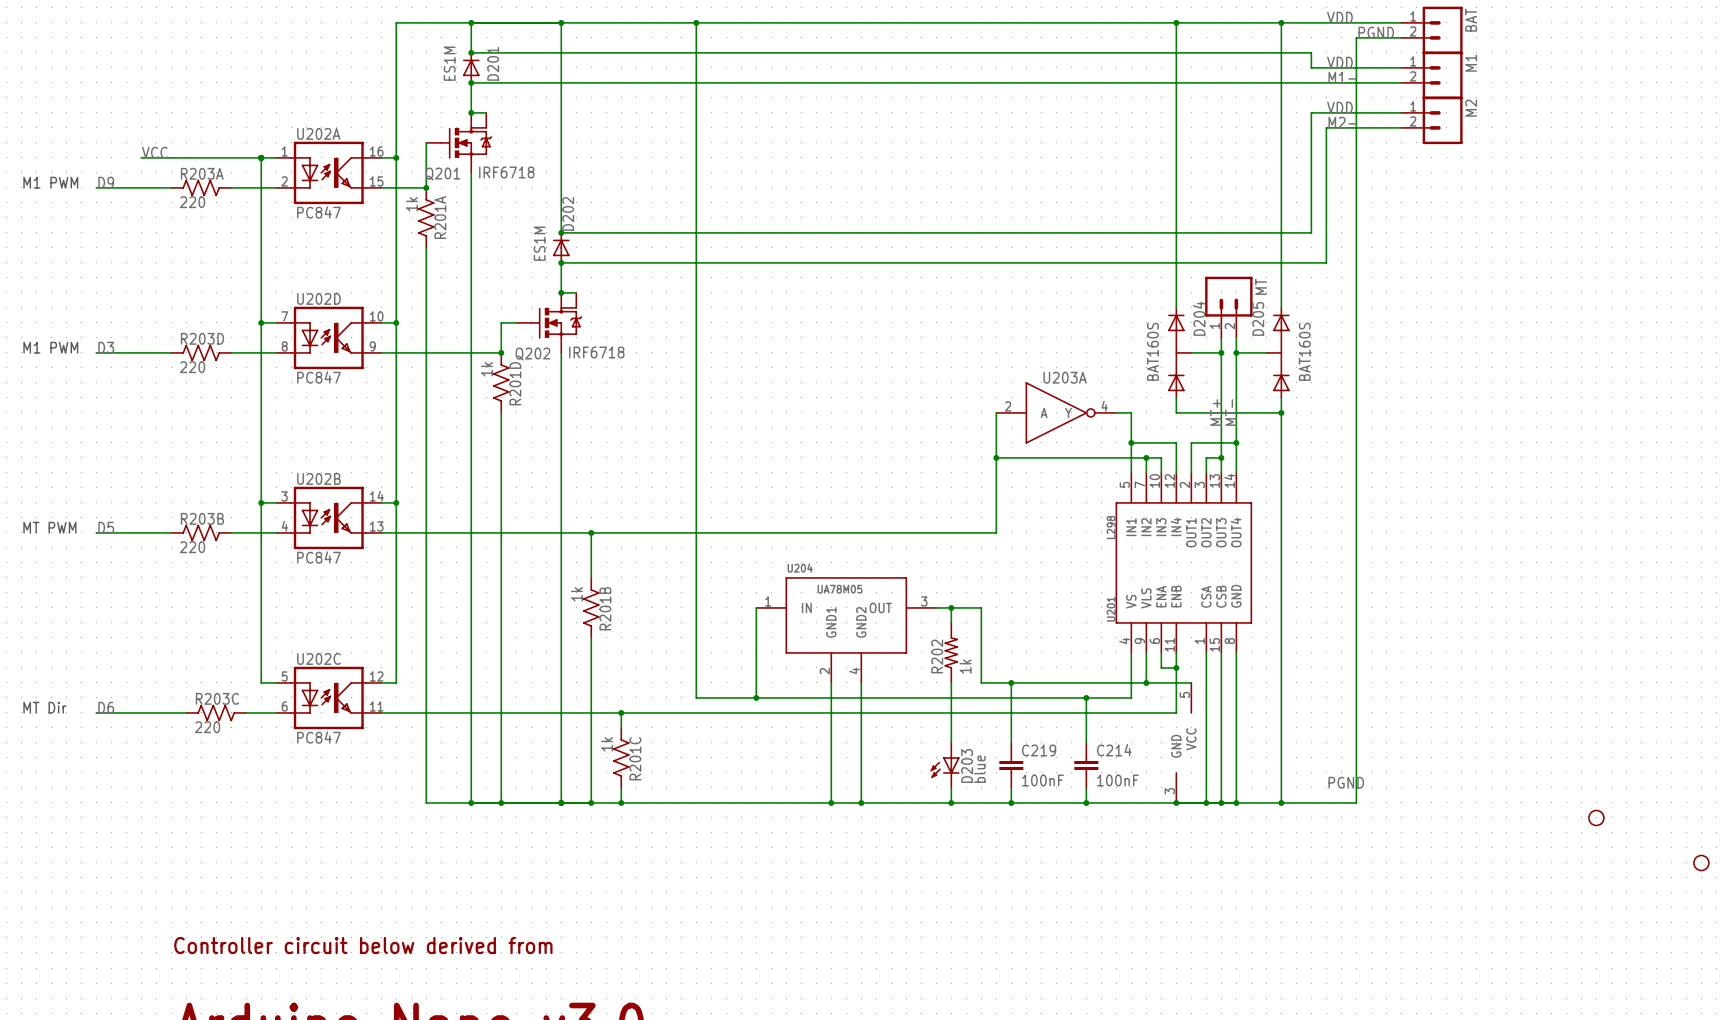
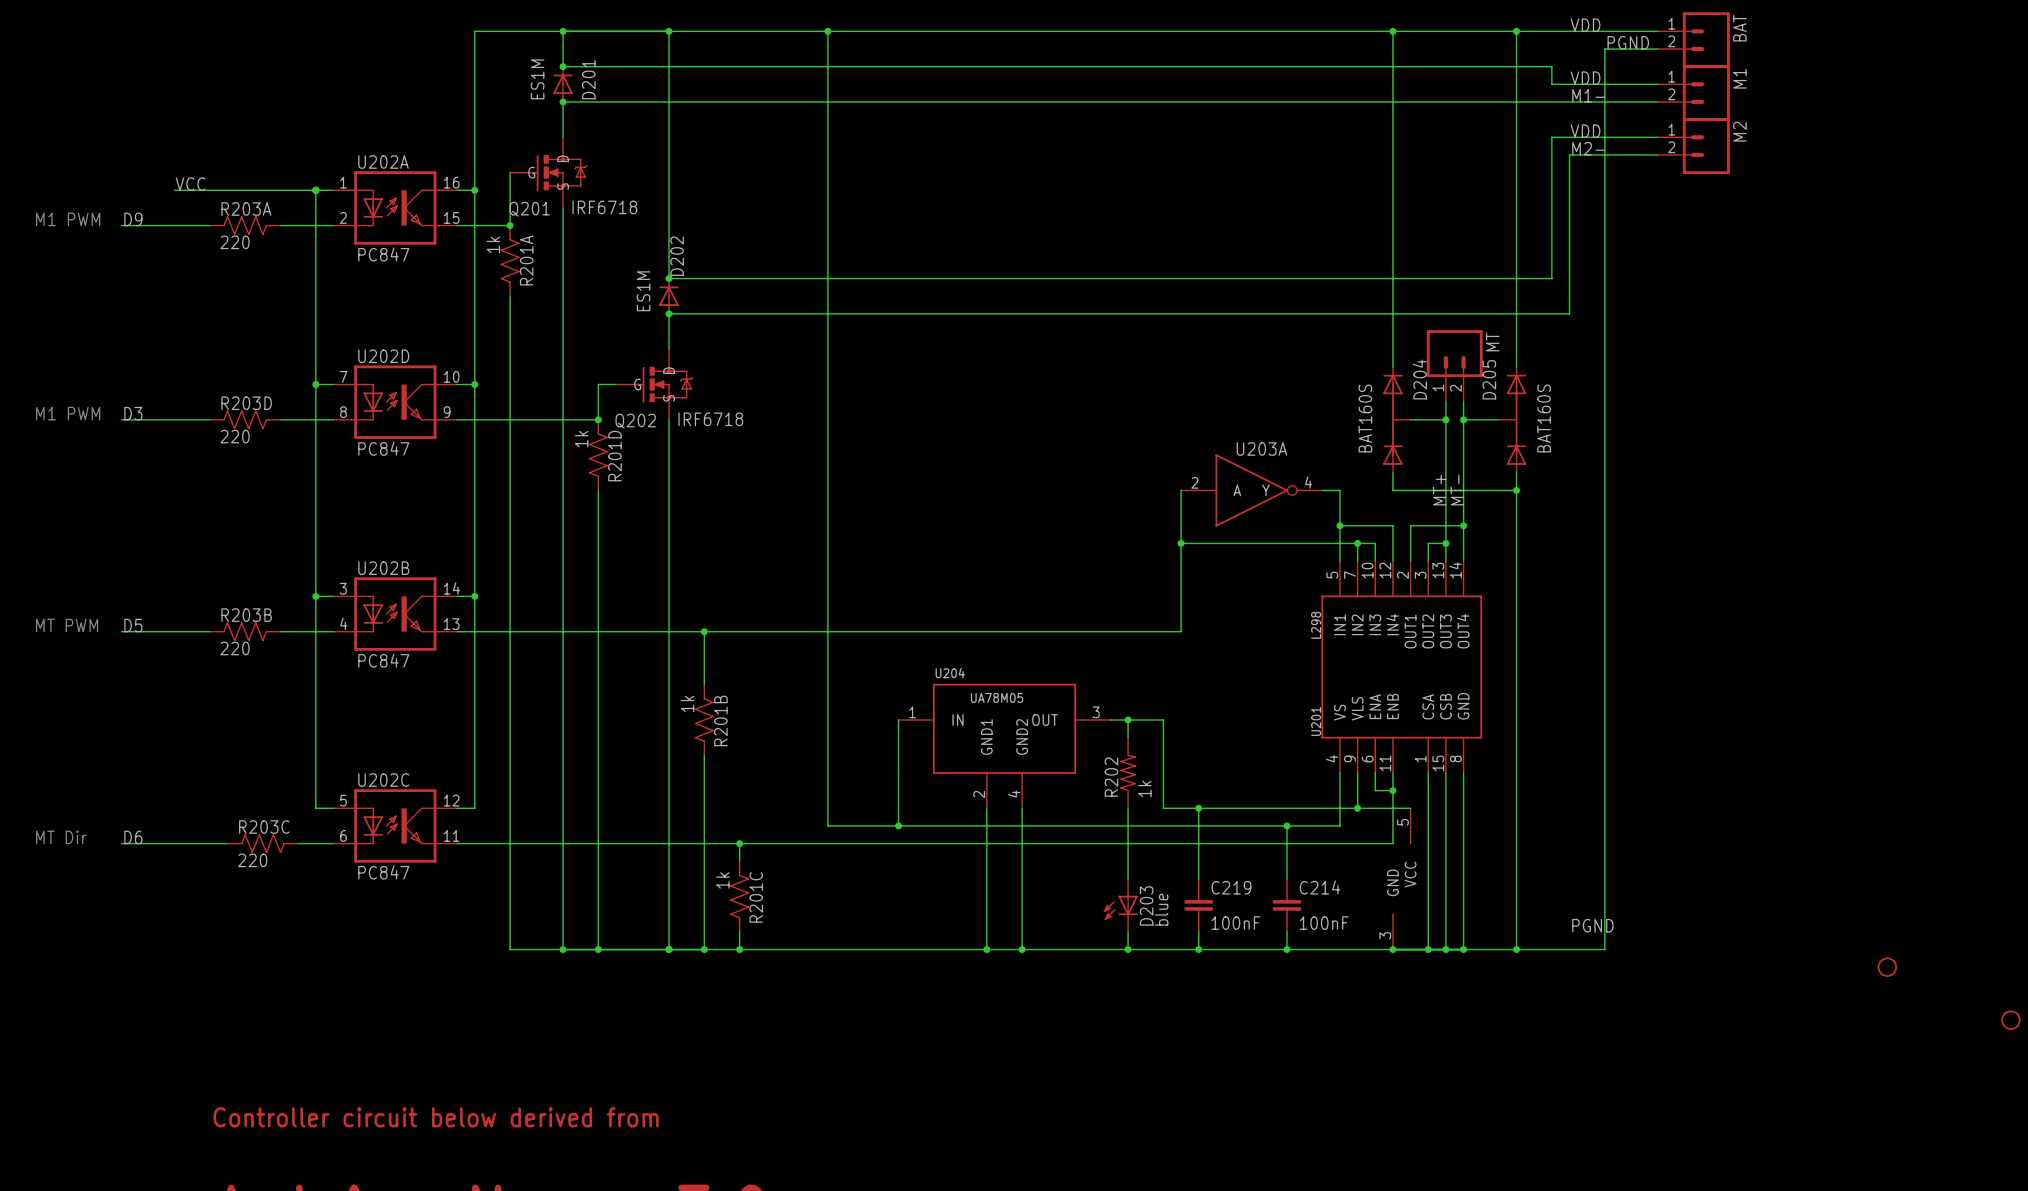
Q201 symbol: [426, 112, 492, 173] -> [509, 136, 588, 209]
wire: (471, 112) (486, 112) -> none
junction: (471, 112) -> none
Q202 symbol: [516, 292, 582, 353] -> [615, 348, 694, 421]
wire: (561, 292) (576, 292) -> none
junction: (561, 292) -> none

